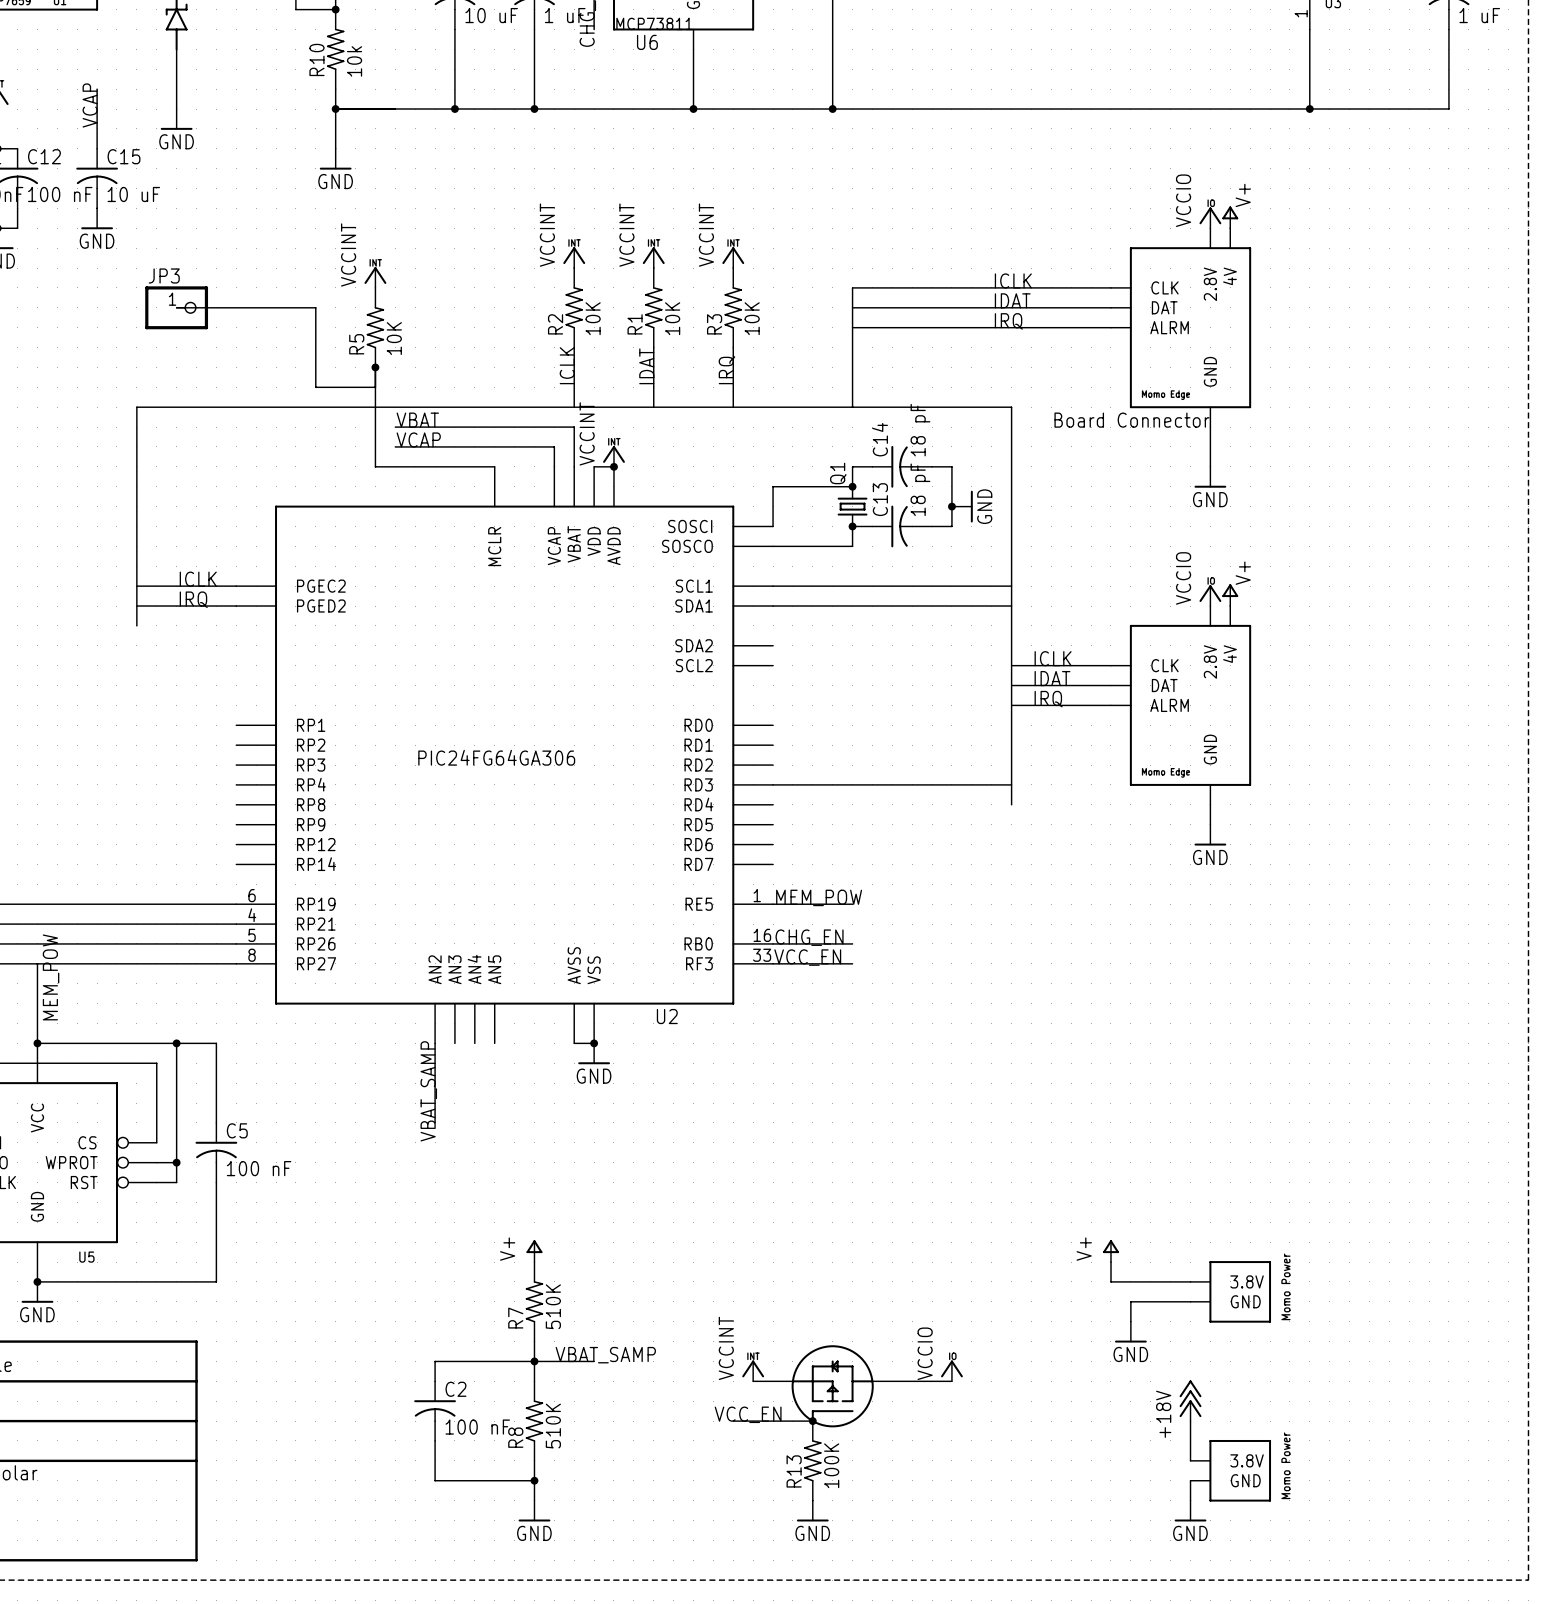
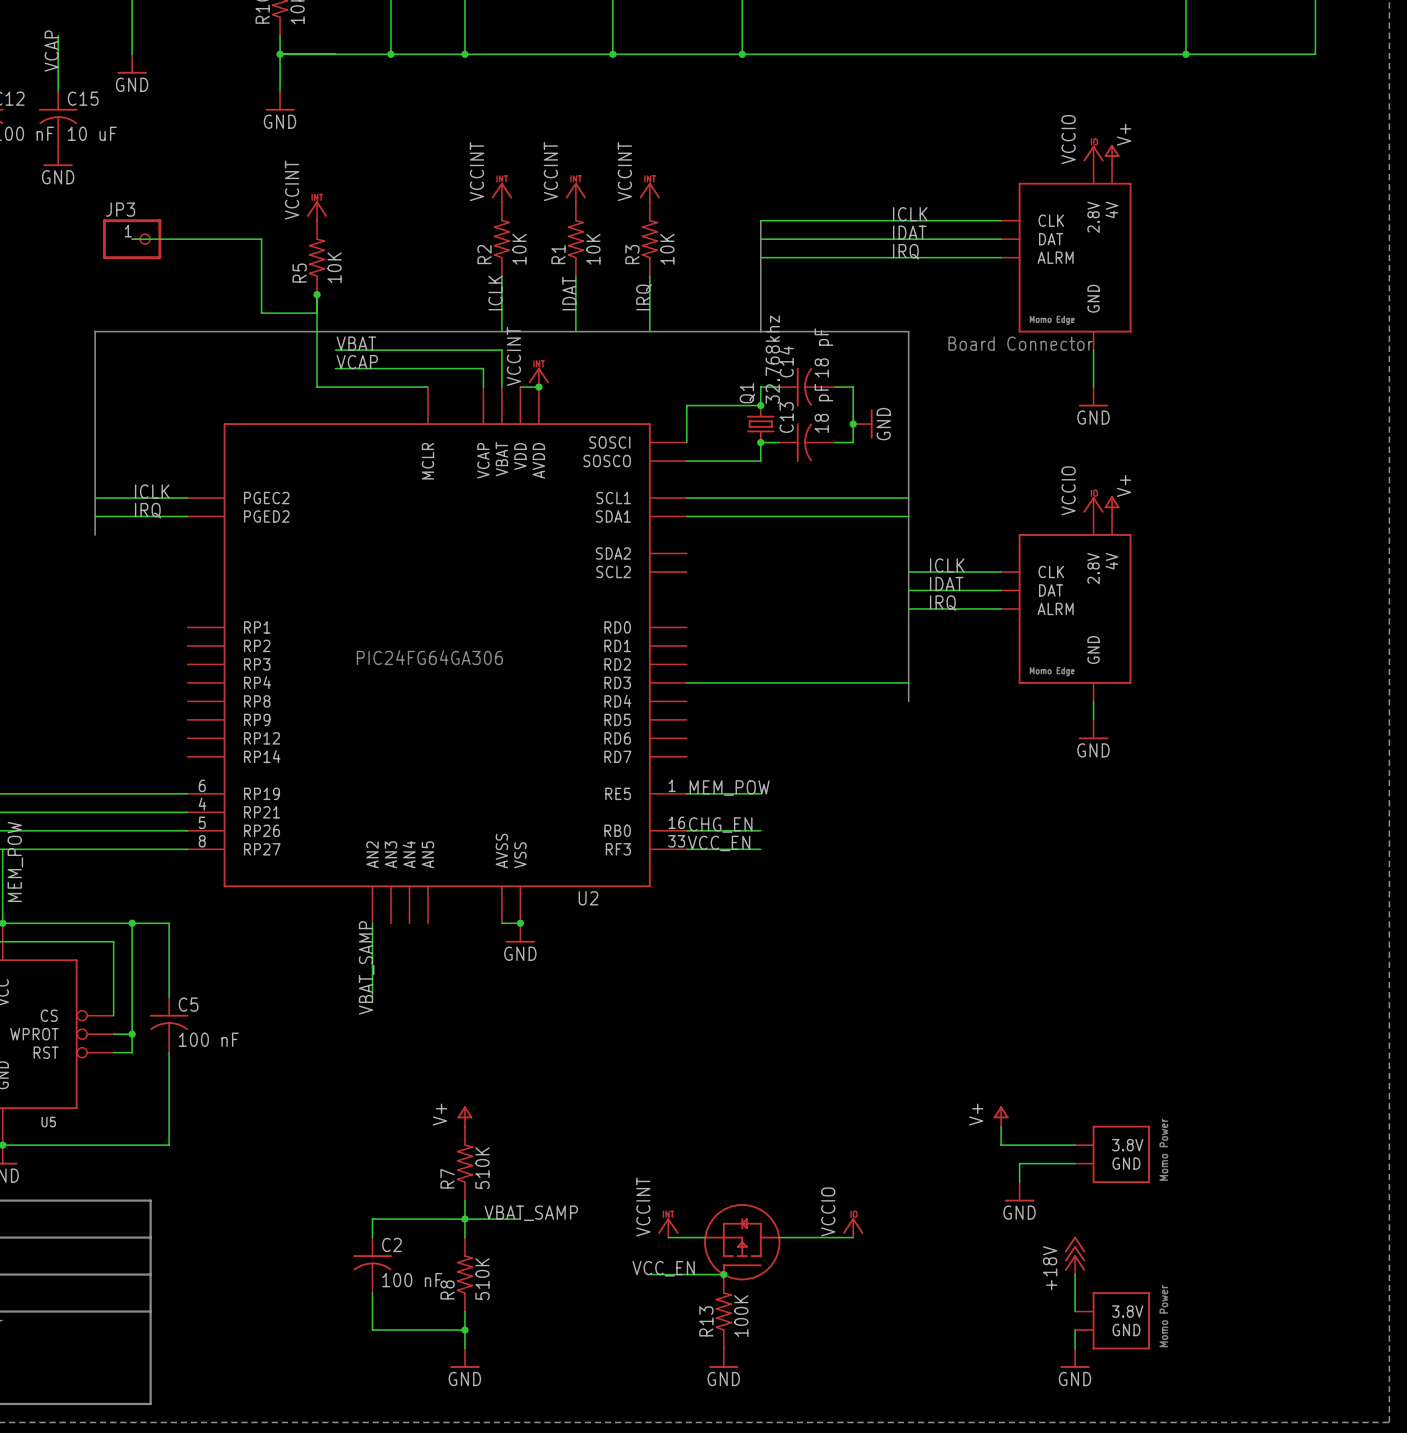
Q1 value: none -> 32.768khz (772, 359)

